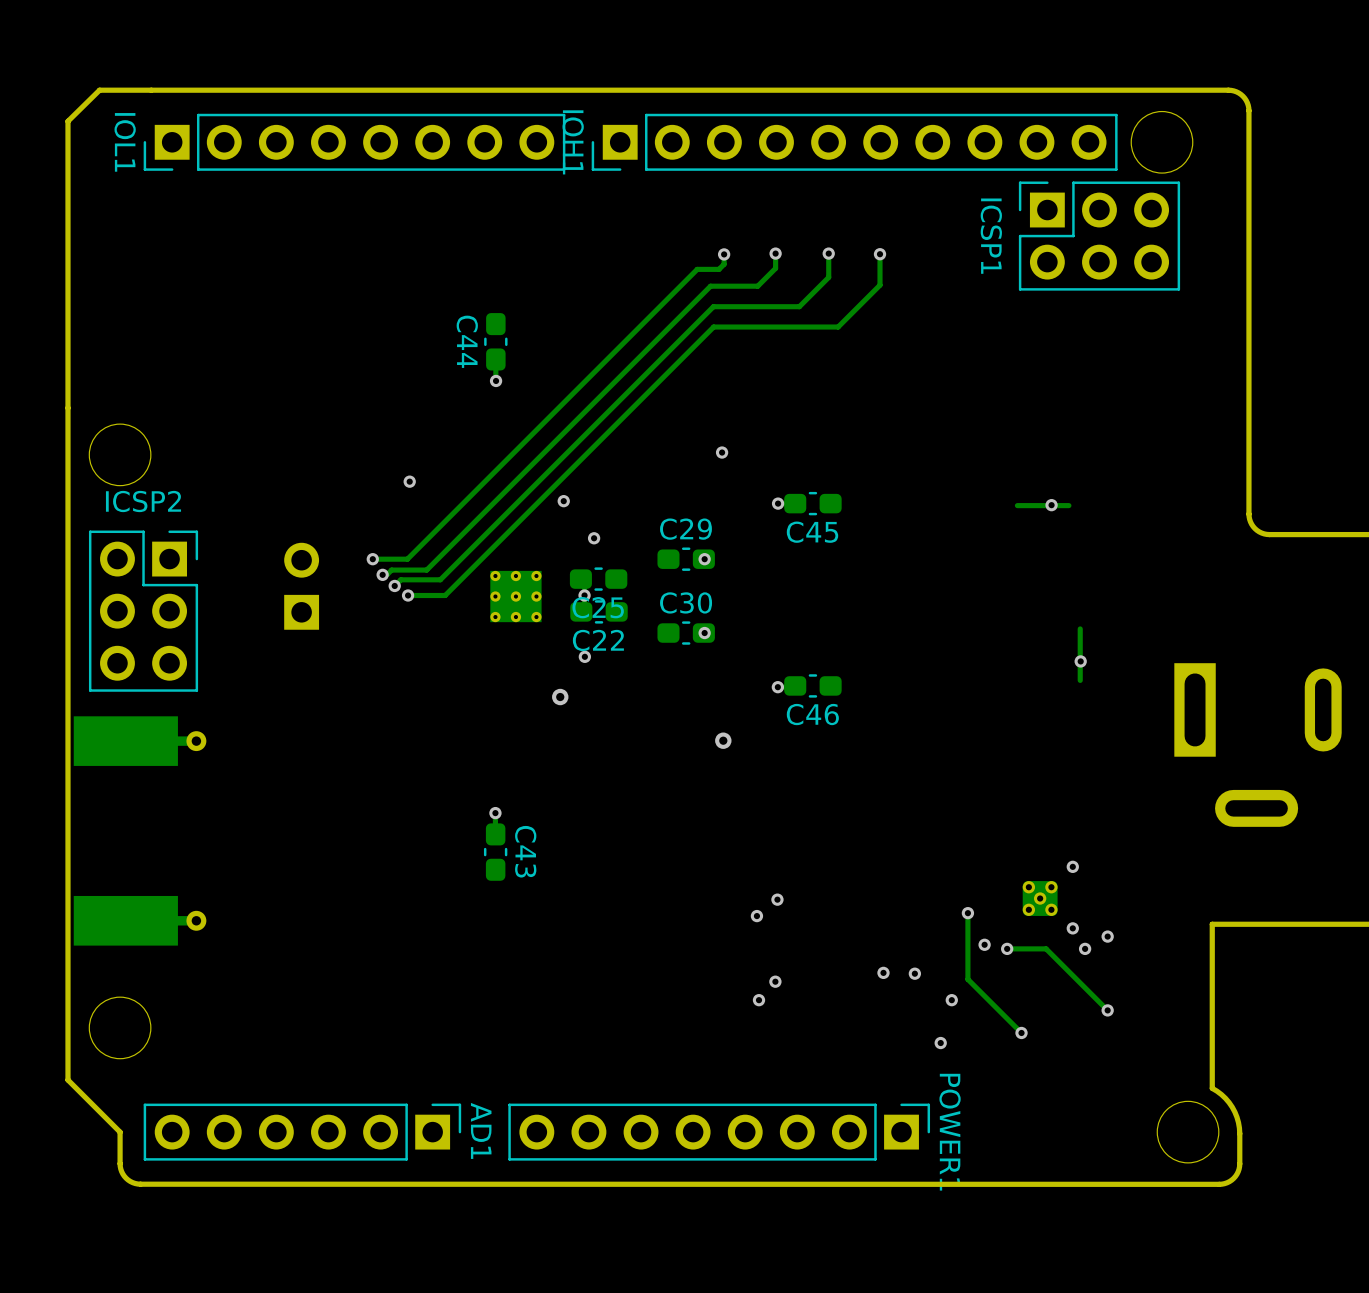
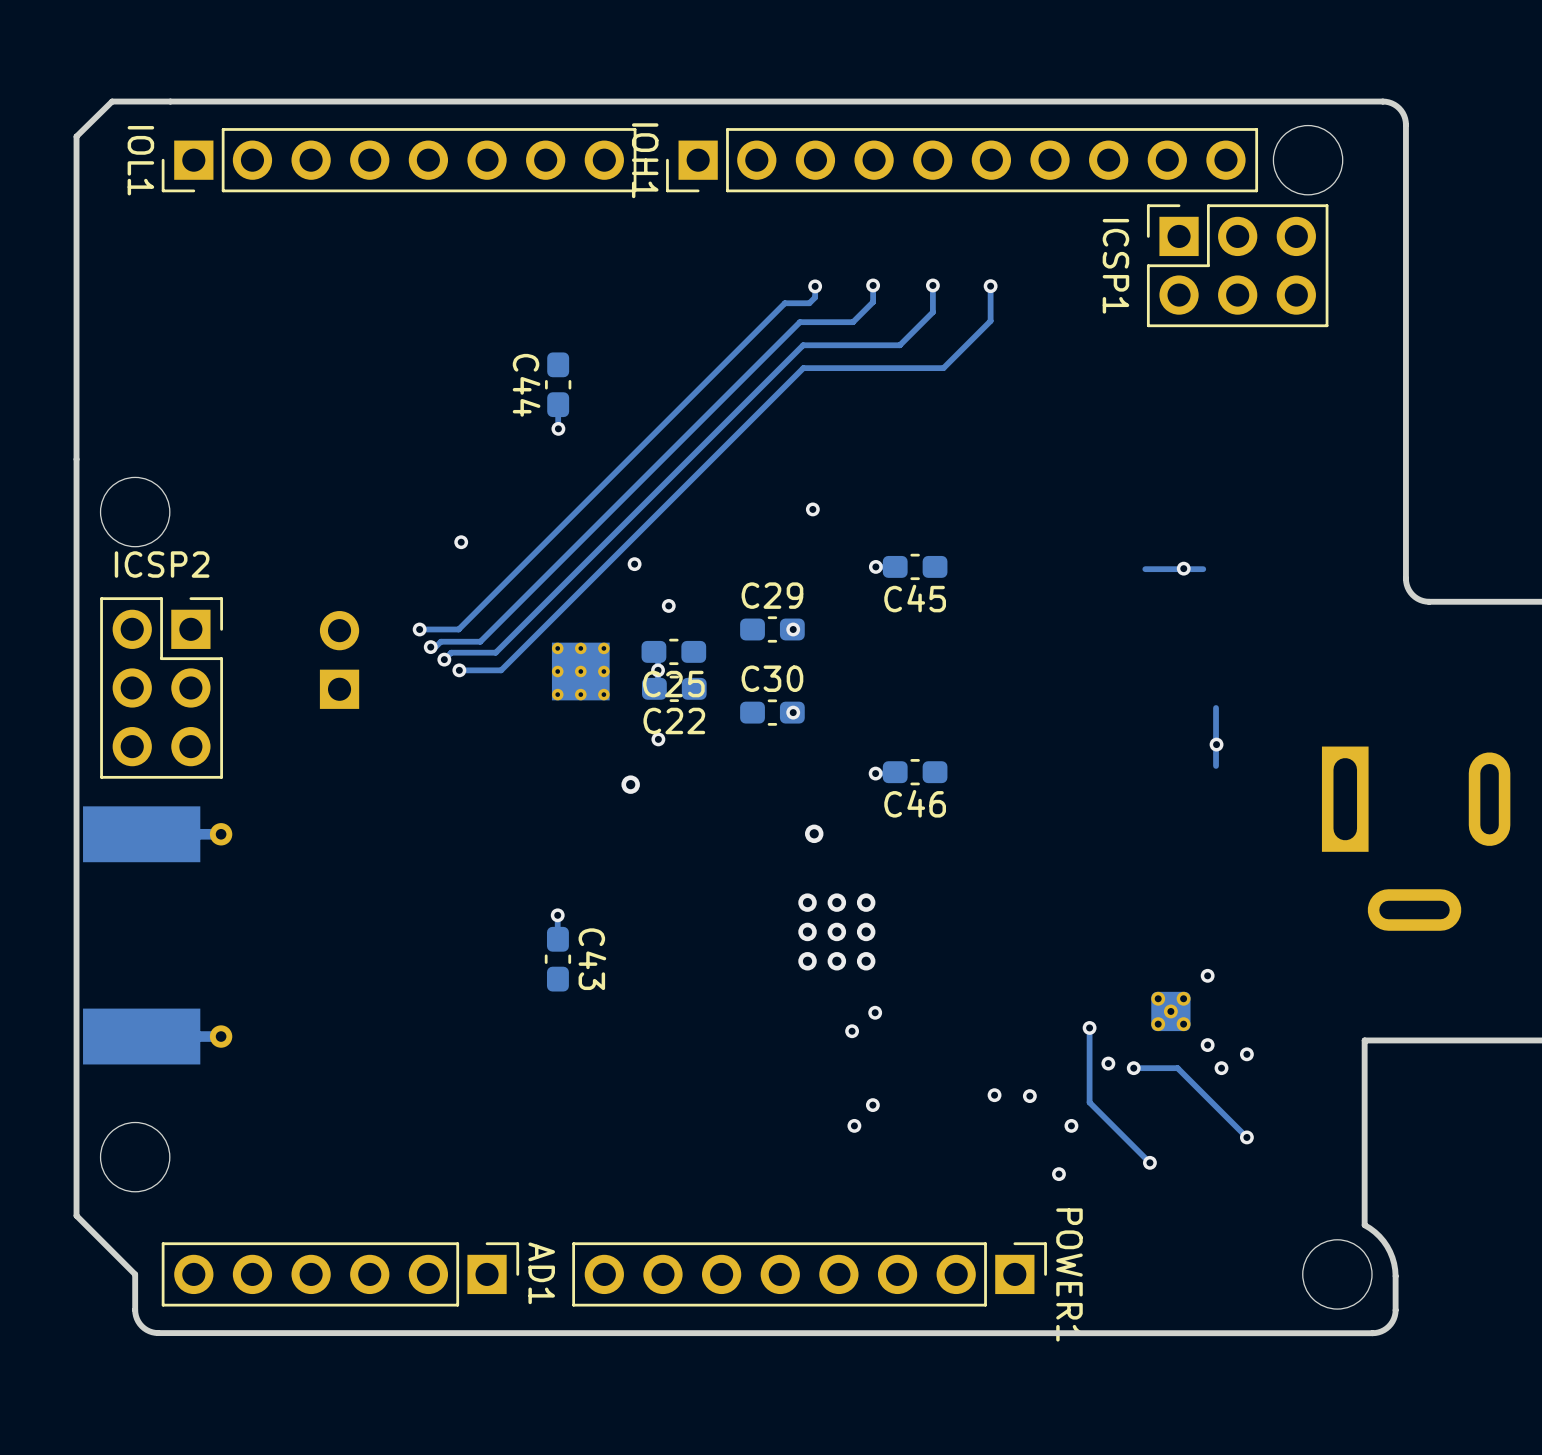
via: none -> (807, 902)
via: none -> (836, 902)
via: none -> (866, 902)
via: none -> (807, 931)
via: none -> (836, 931)
via: none -> (866, 931)
via: none -> (807, 961)
via: none -> (836, 961)
via: none -> (866, 961)

